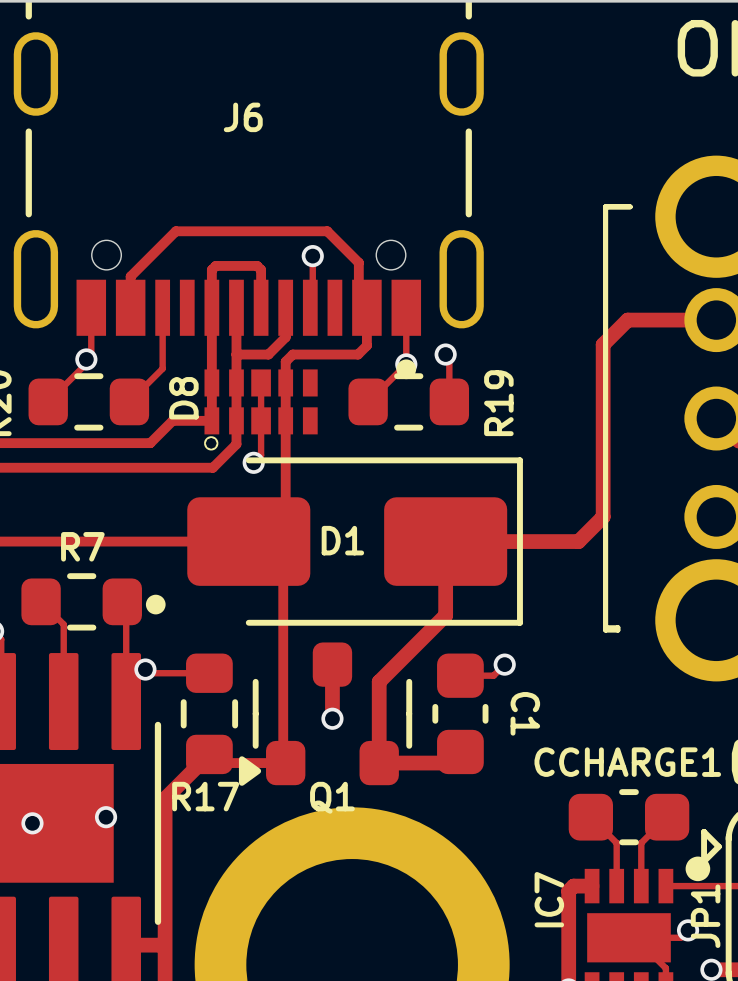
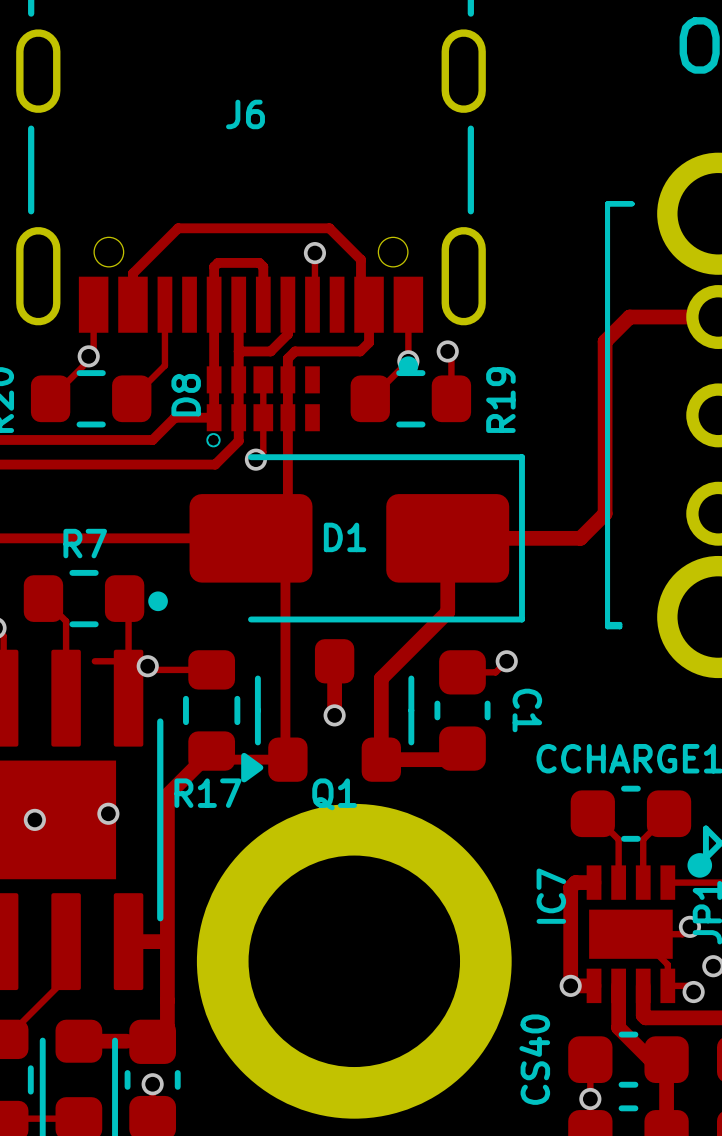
track: none -> (94, 661) (142, 661)

